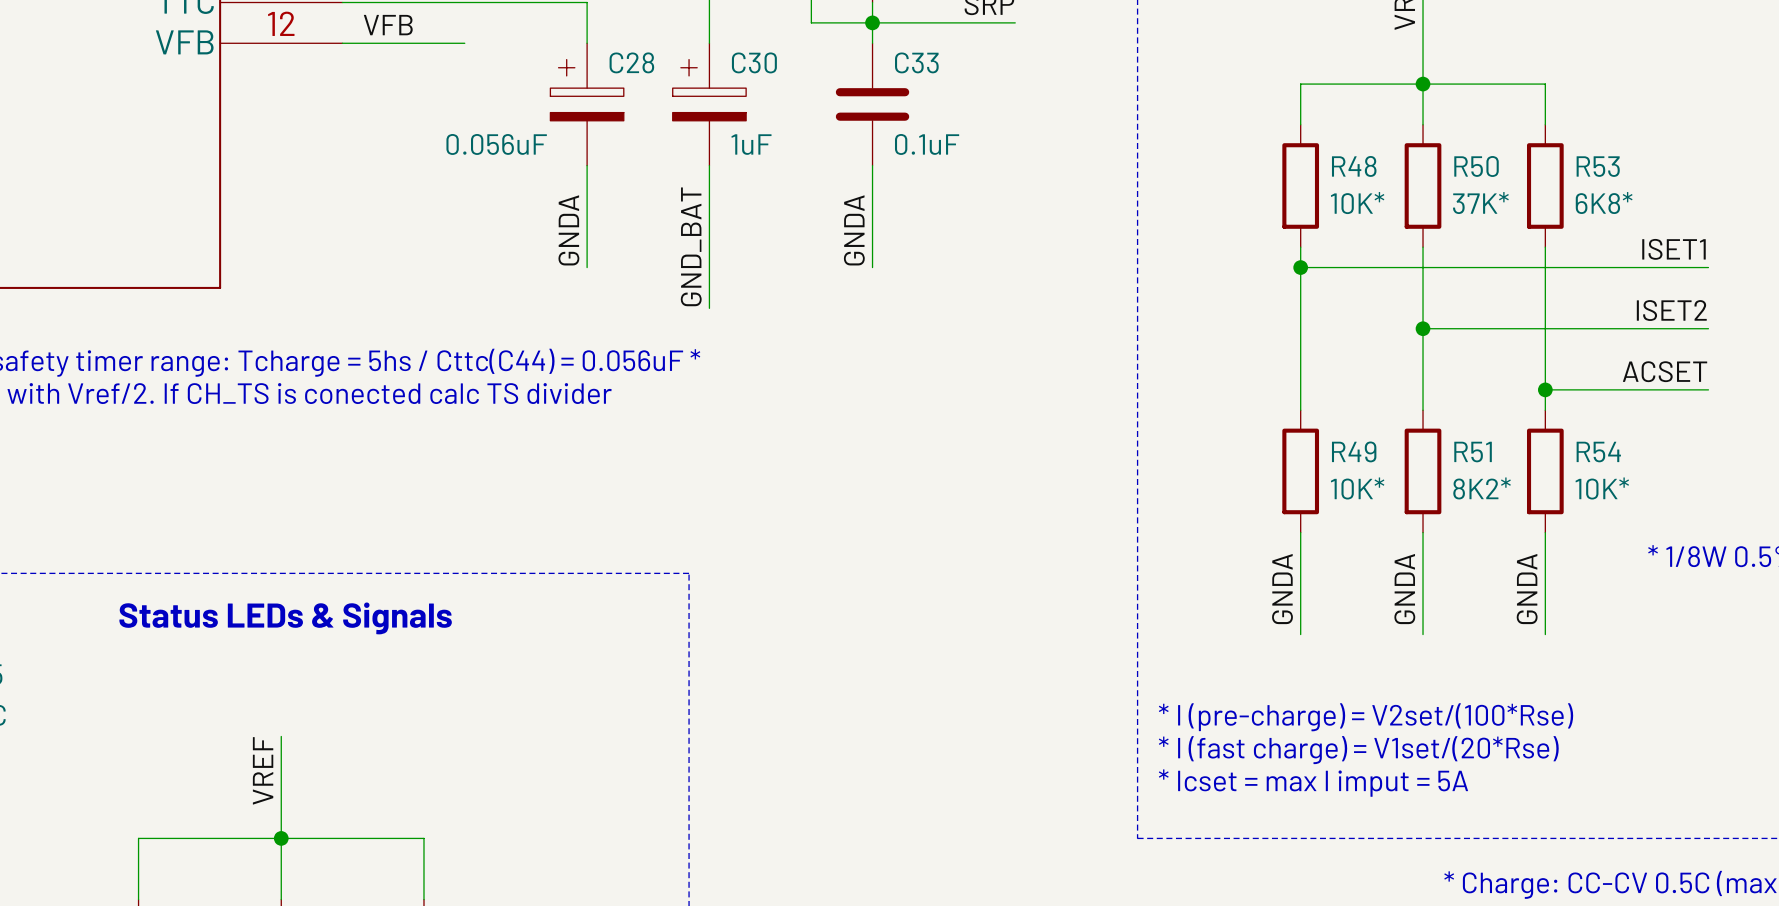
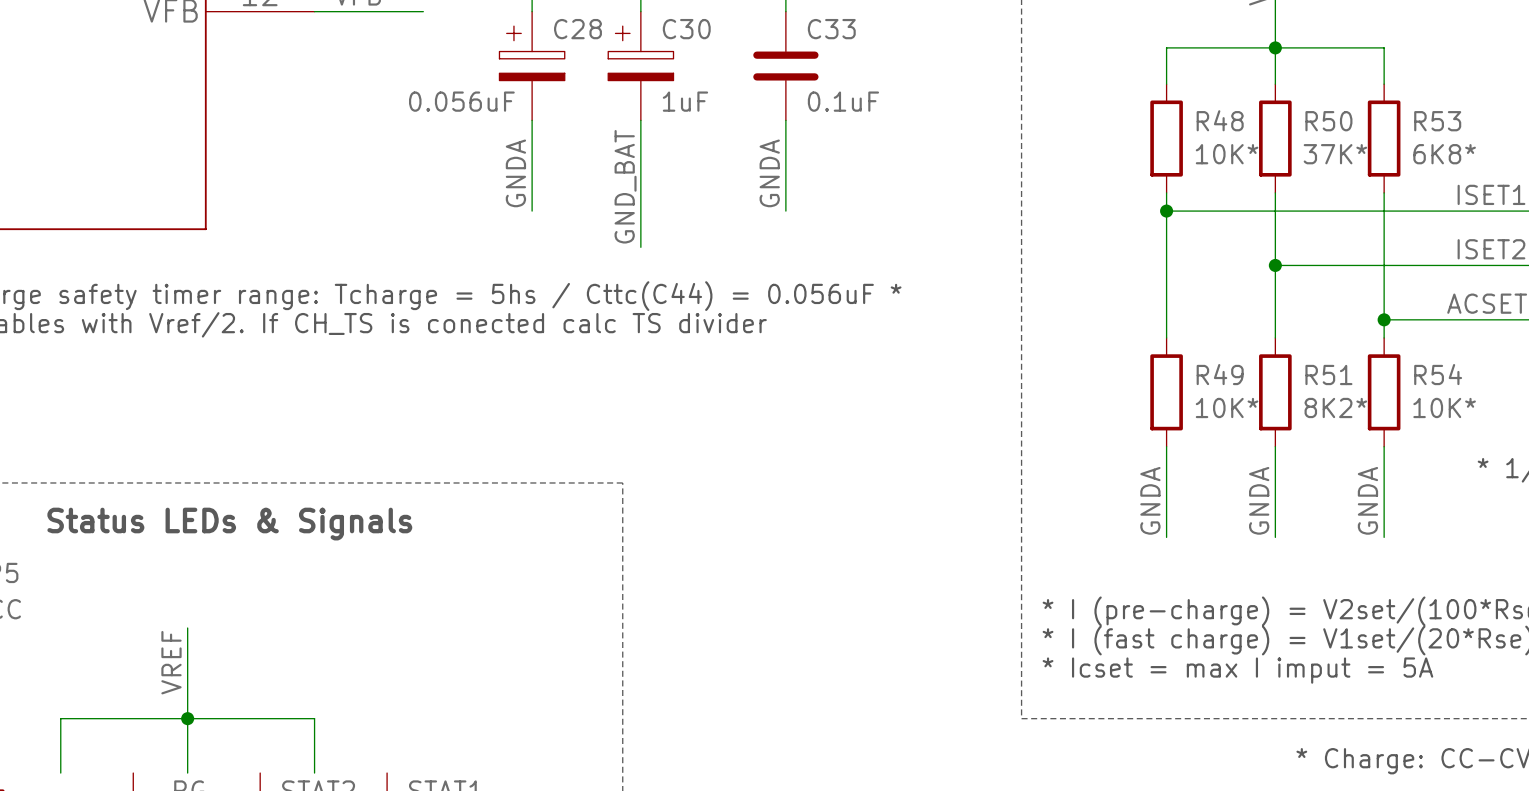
text position: Status LEDs & Signals (285, 618) -> Status LEDs & Signals (229, 524)
wire: (281, 736) (281, 899) -> (187, 628) (187, 773)
label position: VREF (263, 770) -> VREF (171, 662)
wire: (138, 838) (138, 899) -> (133, 718) (60, 718) (60, 773)
junction position: (281, 838) -> (187, 718)
wire: (342, 838) (423, 838) (423, 899) -> (314, 718) (314, 773)

